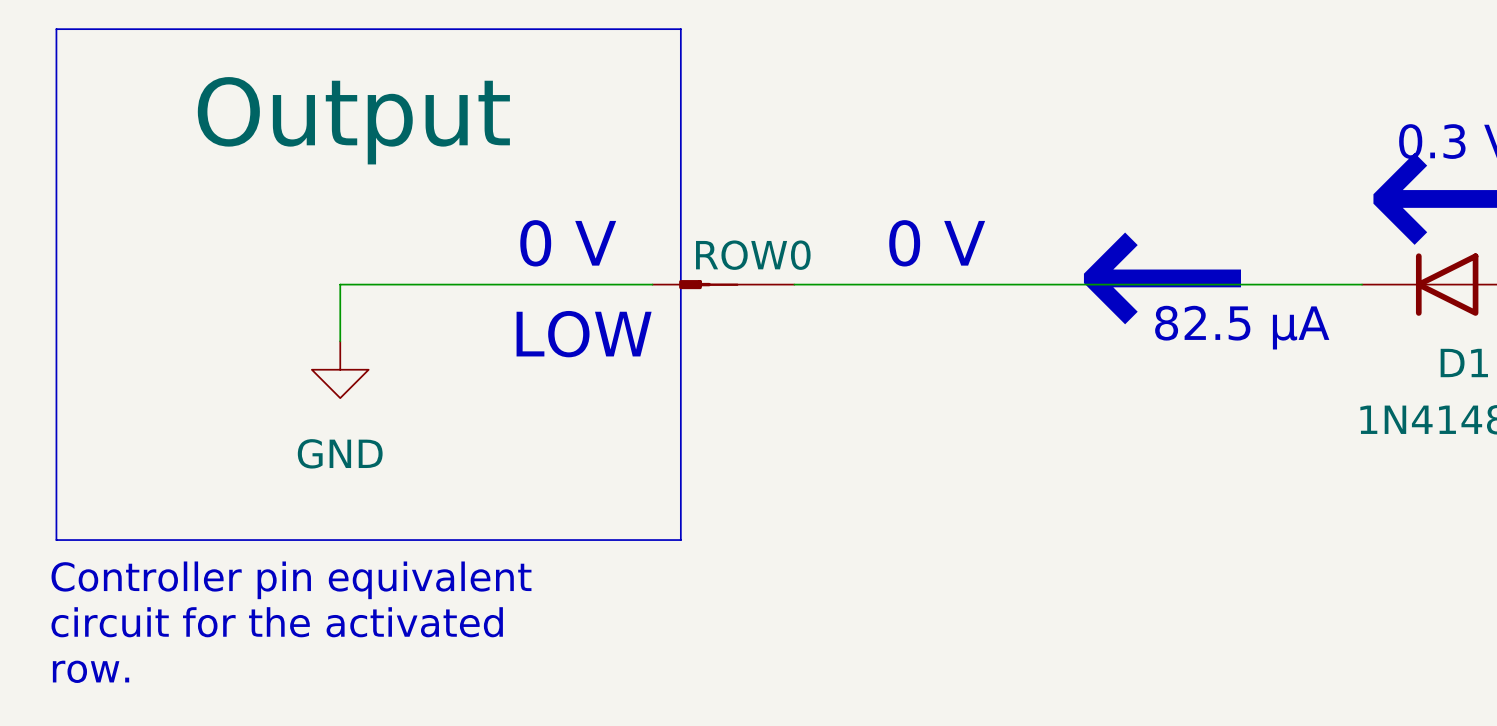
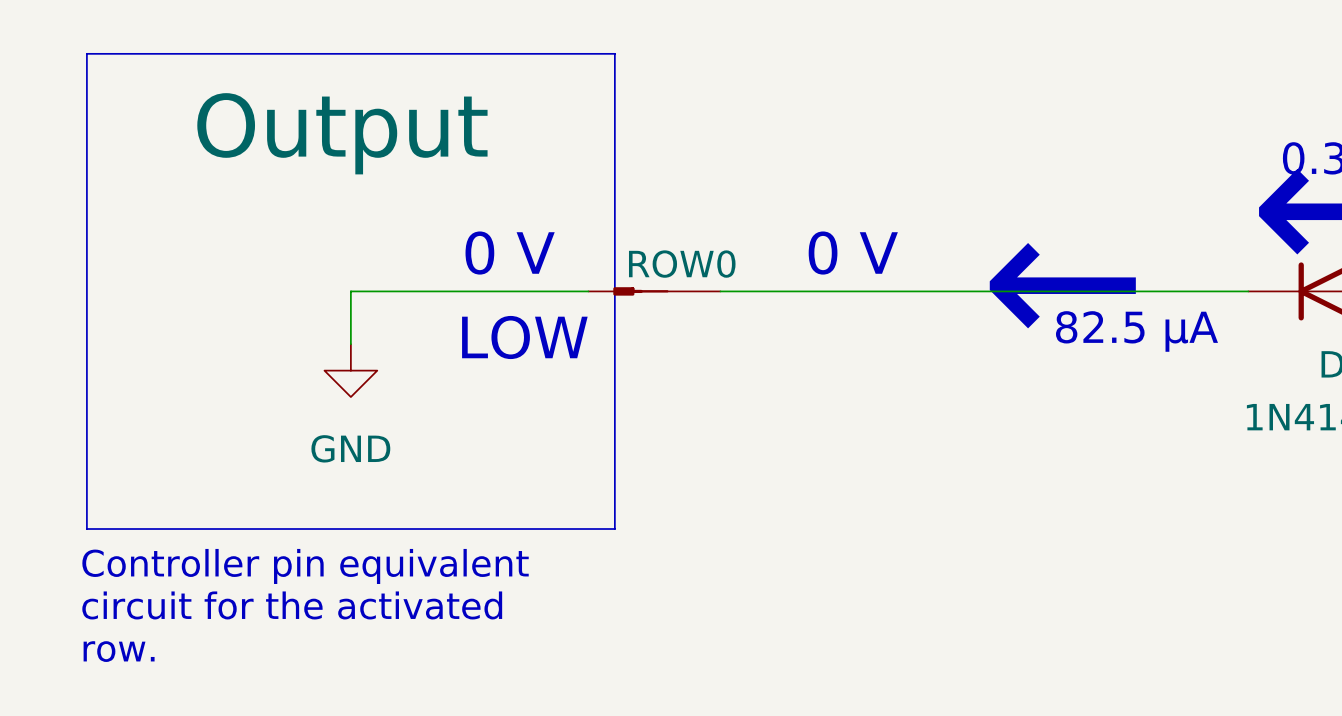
line: (113, 29) (56, 29) (56, 540) (113, 540) -> (86, 53) (86, 529)
Output name position: Output (353, 120) -> Output (342, 133)
wire: (397, 284) (340, 284) (340, 341) -> (350, 291) (350, 344)
power symbol position: GND (340, 369) -> GND (350, 370)
text position: Controller pin equivalent (291, 580) -> Controller pin equivalent (305, 566)
text position: circuit for the activated (277, 622) -> circuit for the activated (292, 605)
text position: row. (91, 671) -> row. (119, 651)

